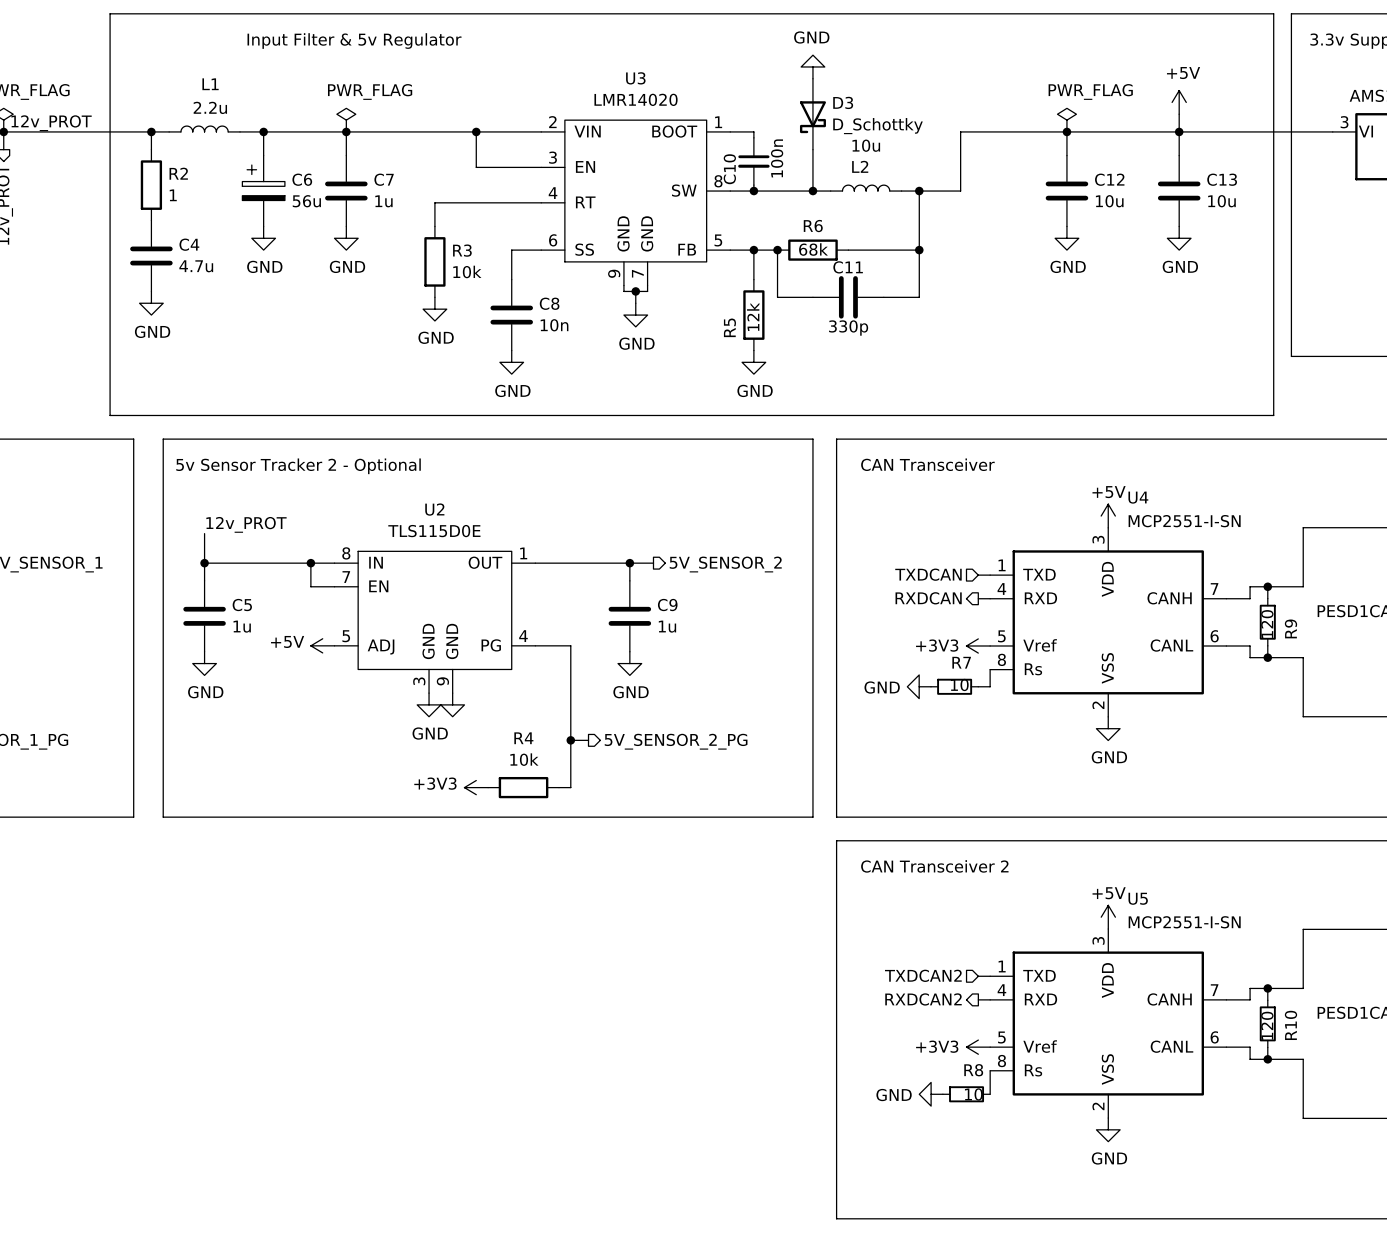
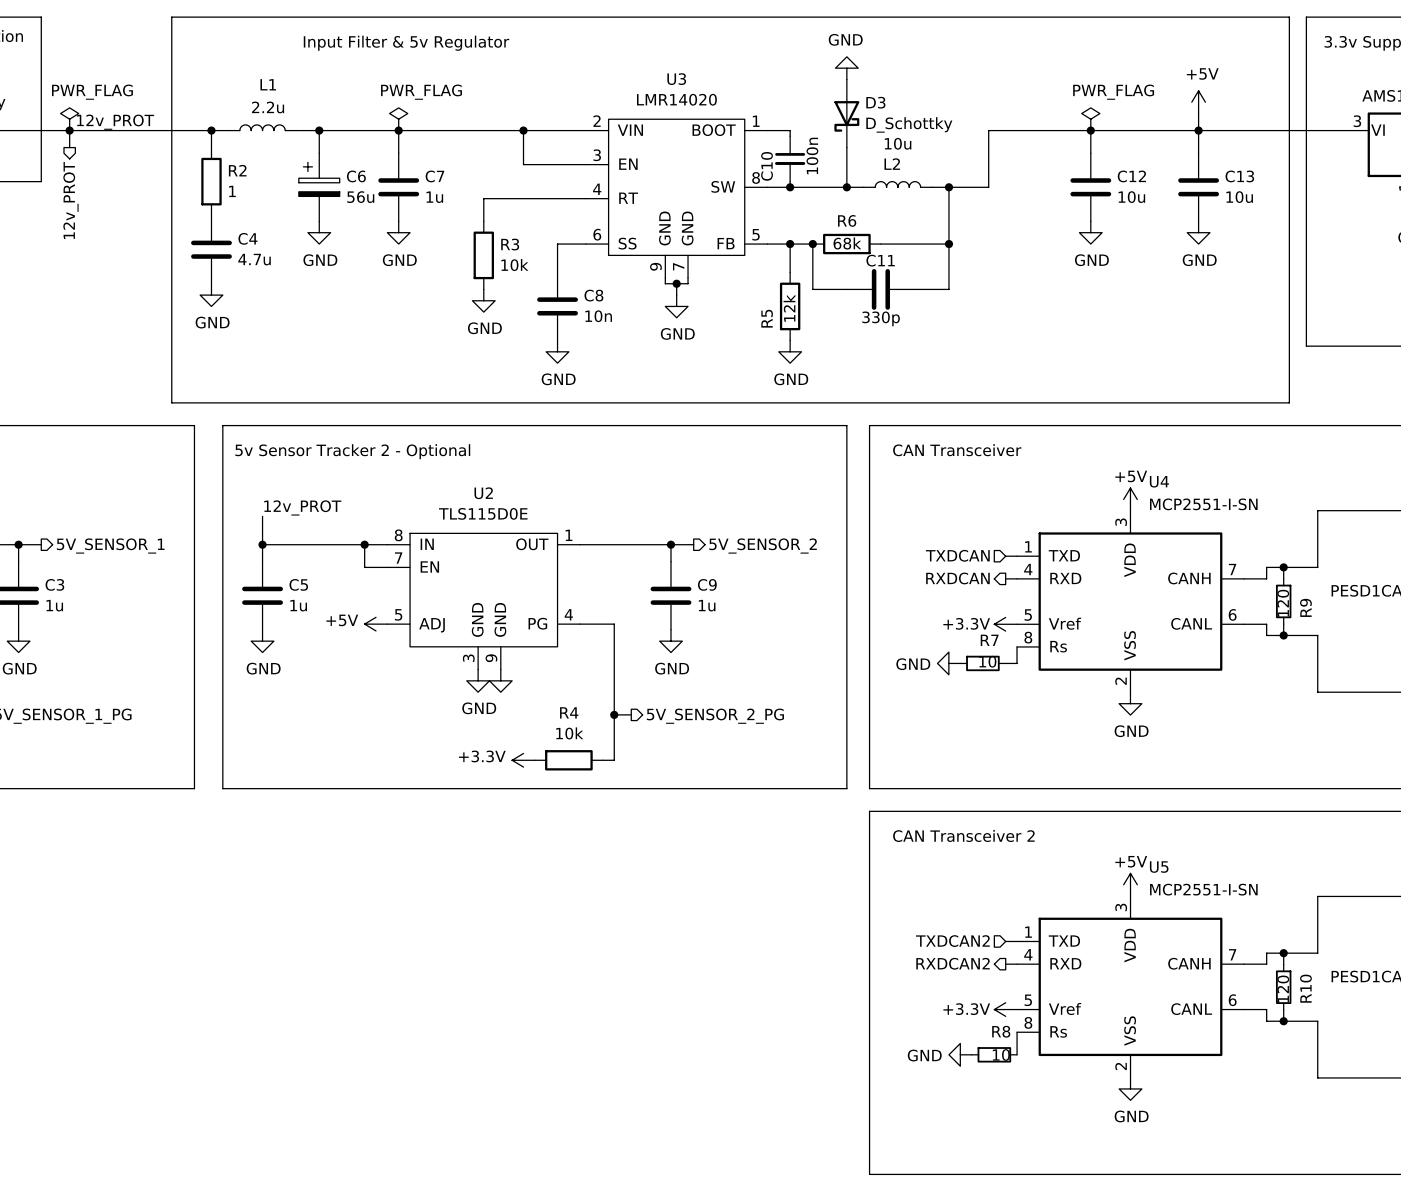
power symbol: +3V3 (978, 646) -> +3.3V (1005, 624)
power symbol: +3V3 (476, 787) -> +3.3V (523, 760)
power symbol: +3V3 (978, 1047) -> +3.3V (1005, 1009)

